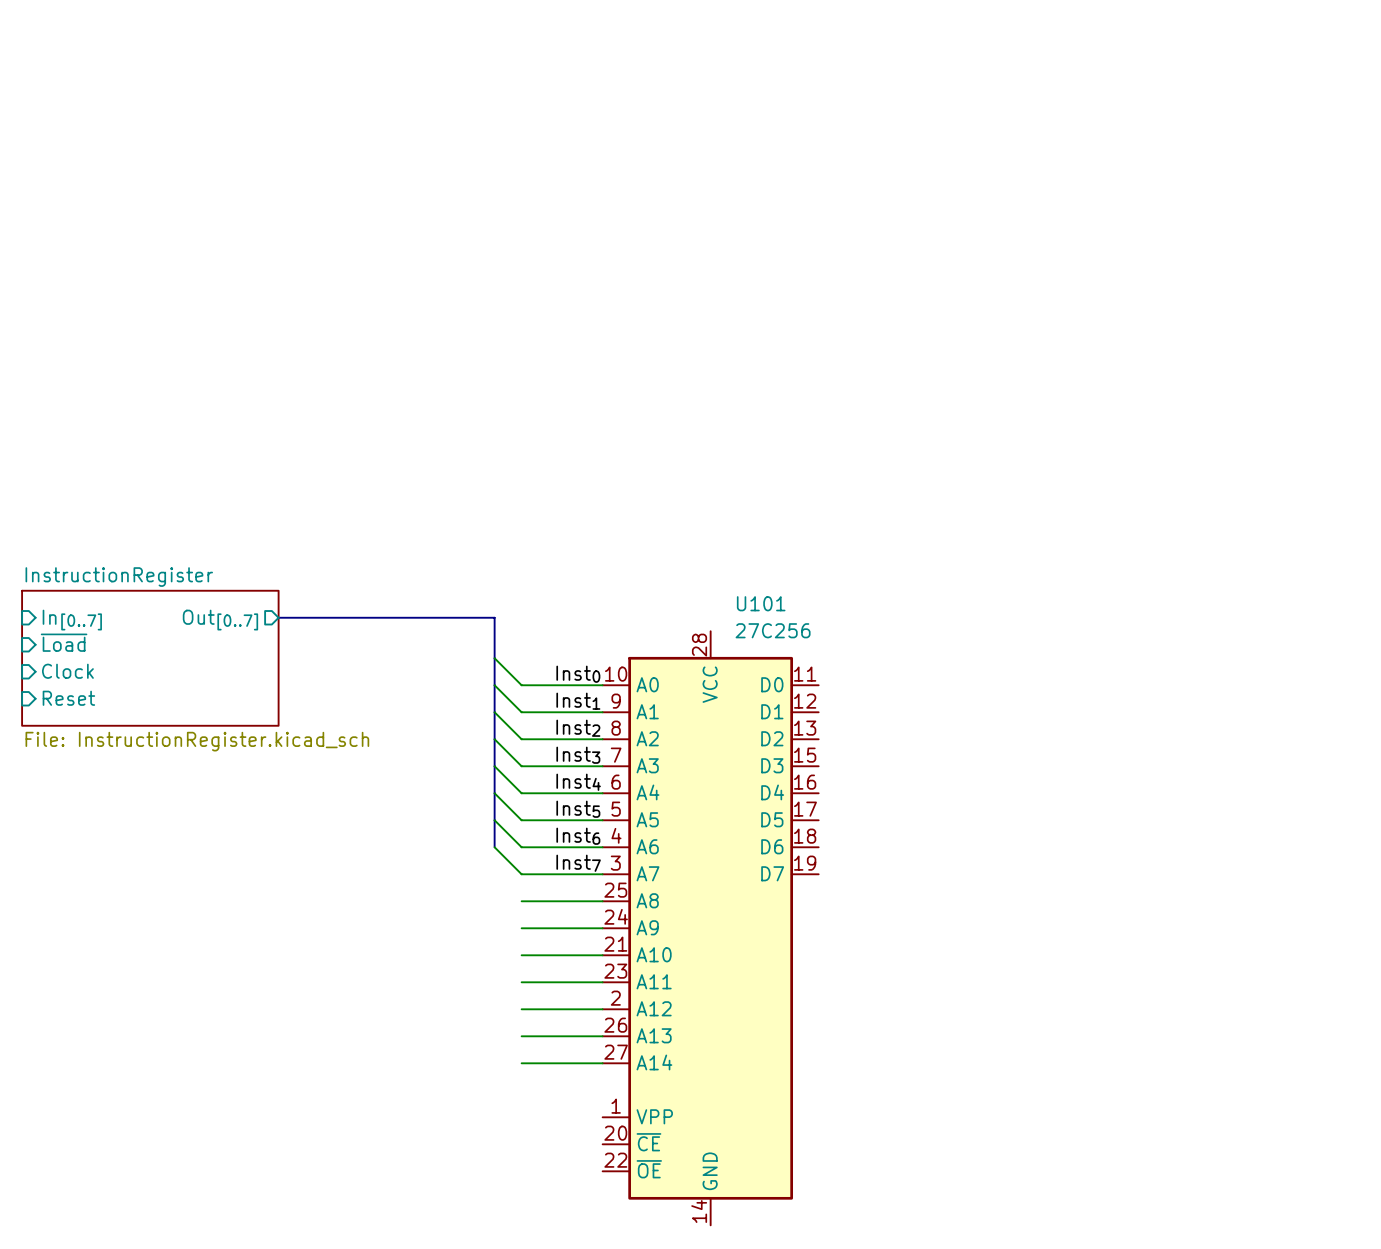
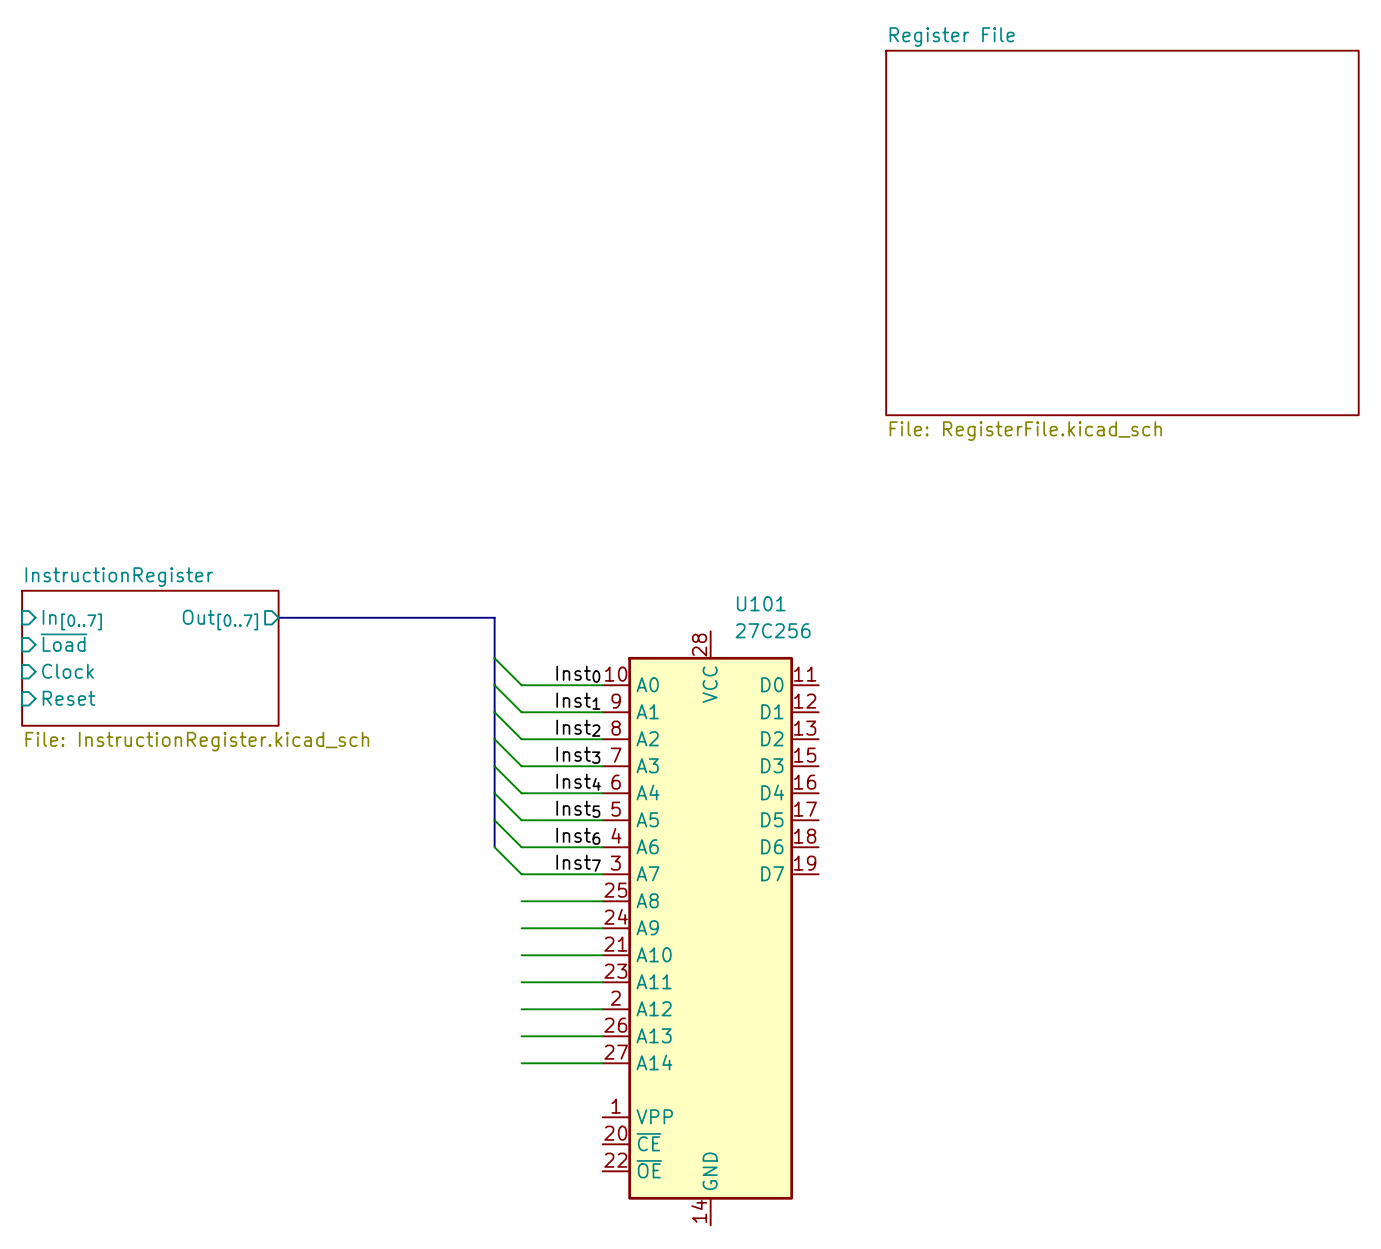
sheet Register File: none -> File: RegisterFile.kicad_sch (1122, 232)

